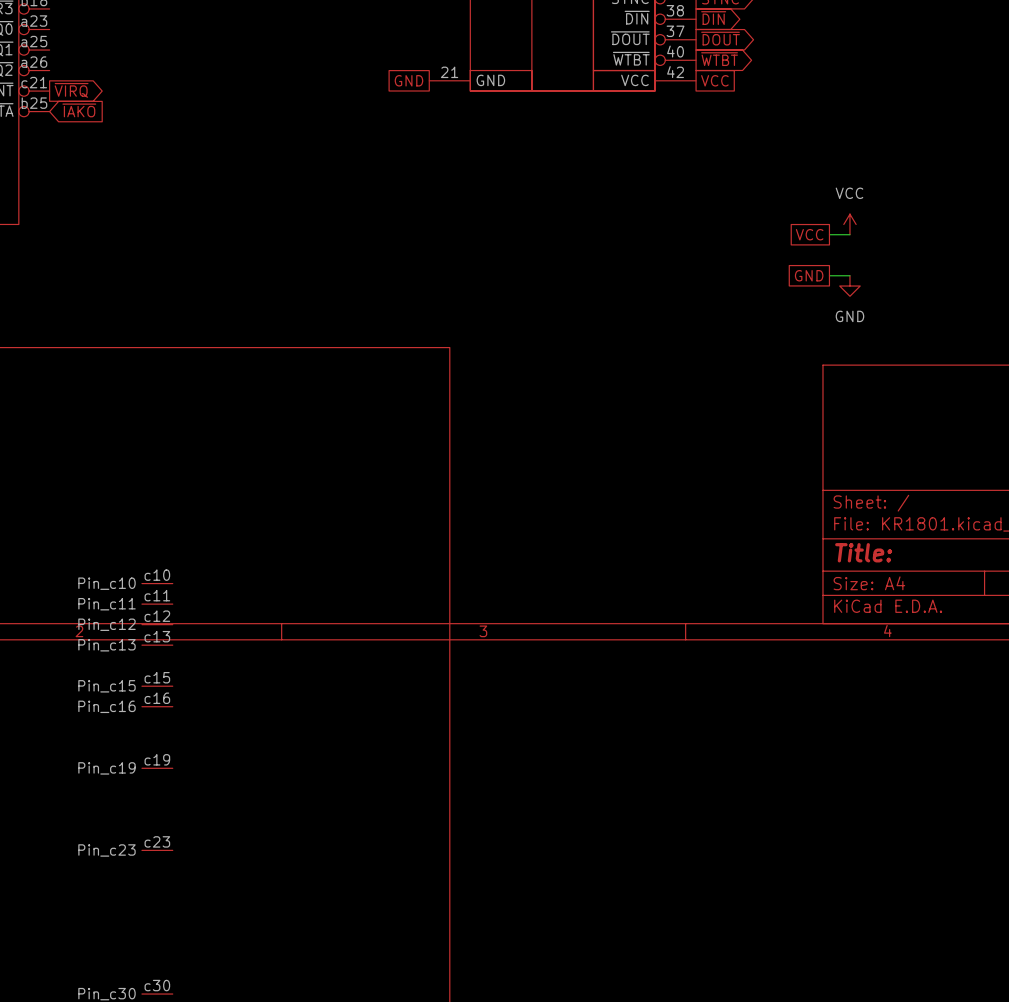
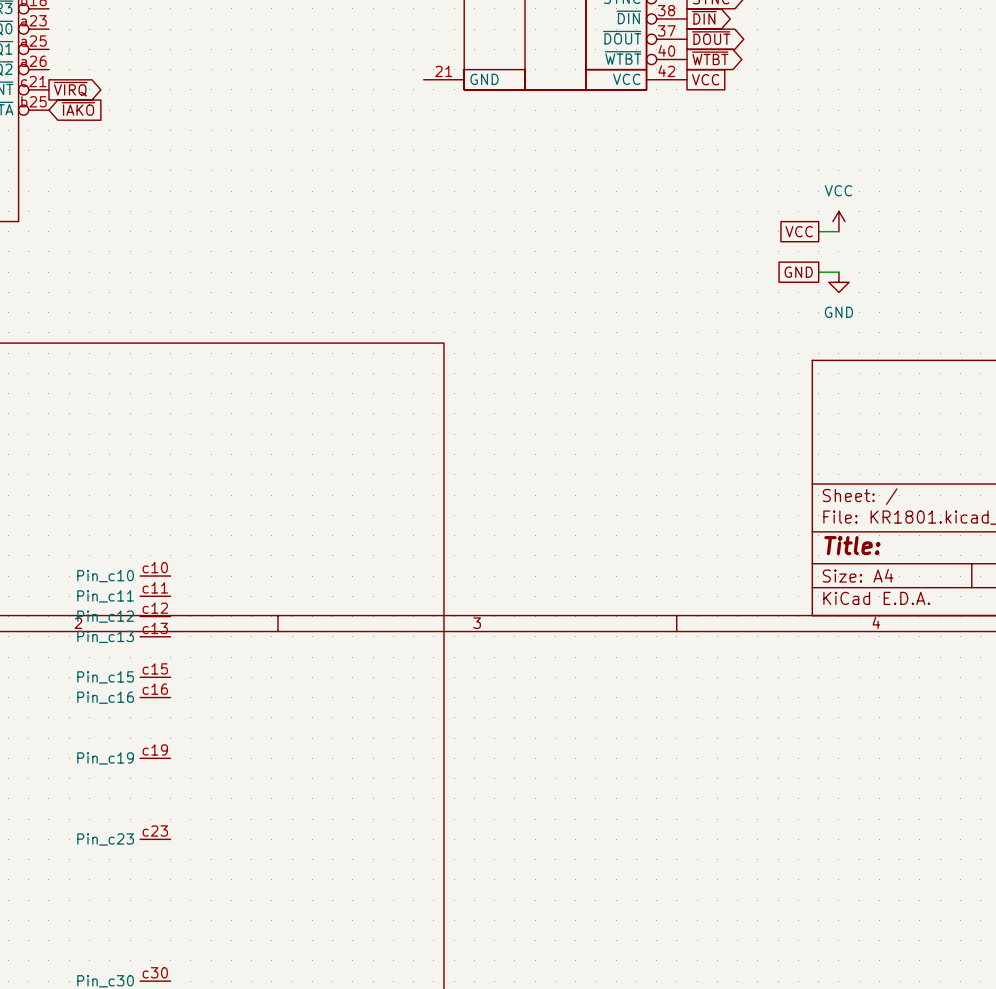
global label: GND (408, 80) -> none

